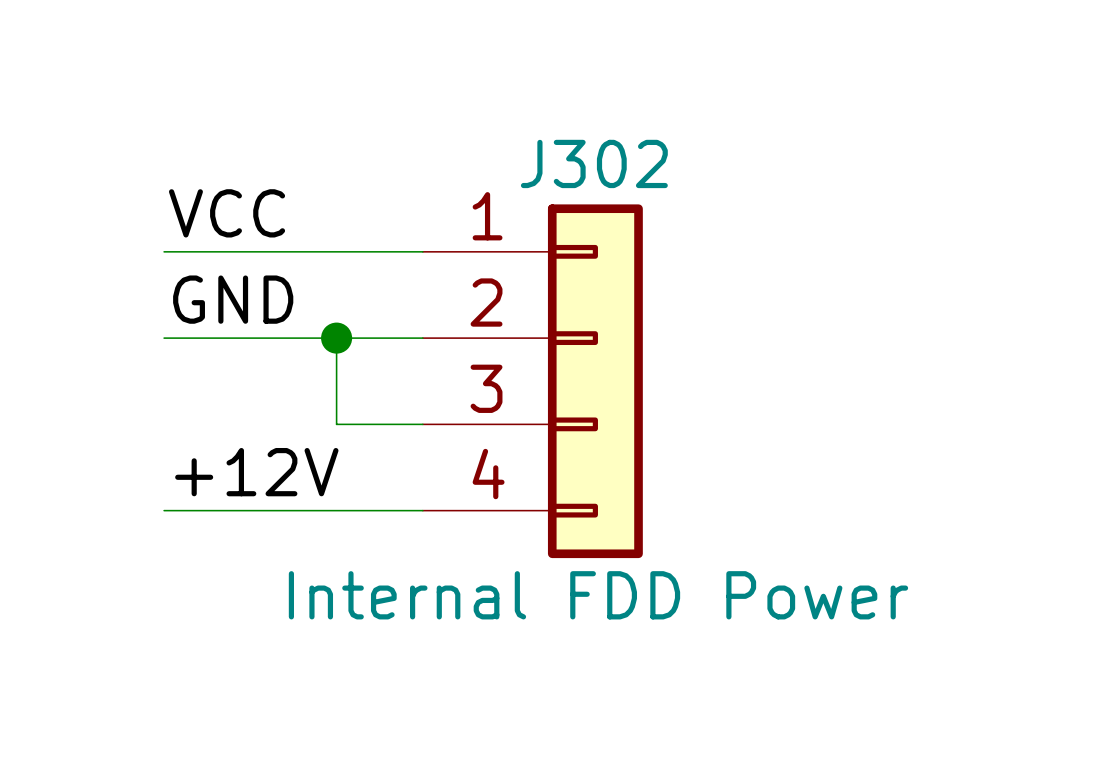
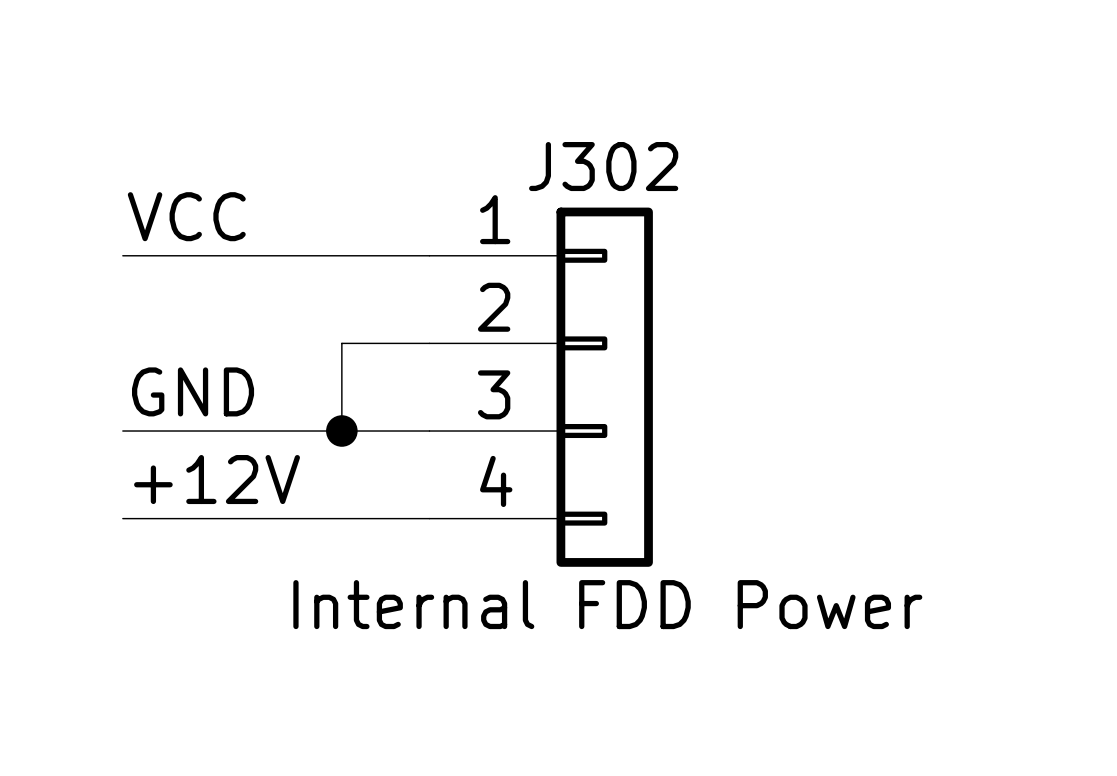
label position: VCC (227, 213) -> VCC (186, 216)
wire: none -> (122, 255) (166, 255)
label position: GND (233, 299) -> GND (193, 391)
wire: (164, 338) (336, 338) -> none
junction position: (336, 338) -> (341, 431)
wire: none -> (122, 431) (341, 431)
label position: +12V (256, 472) -> +12V (217, 479)
wire: none -> (122, 518) (166, 518)

